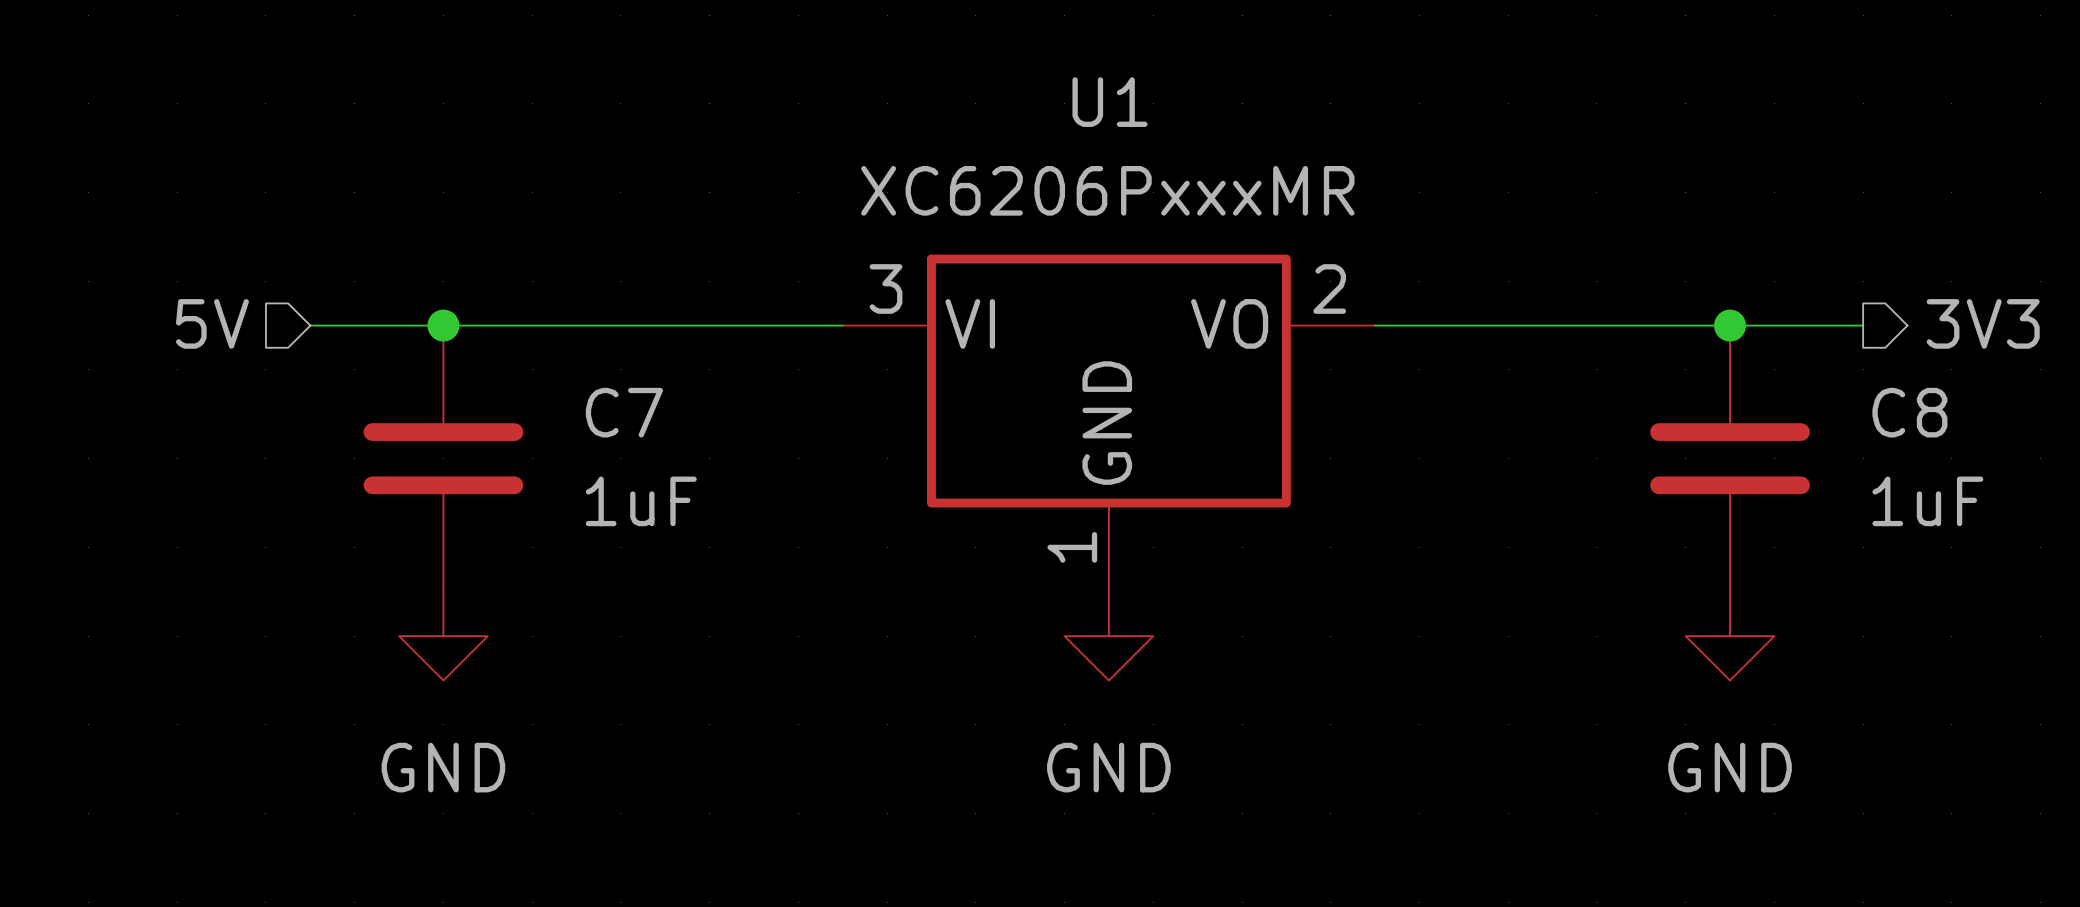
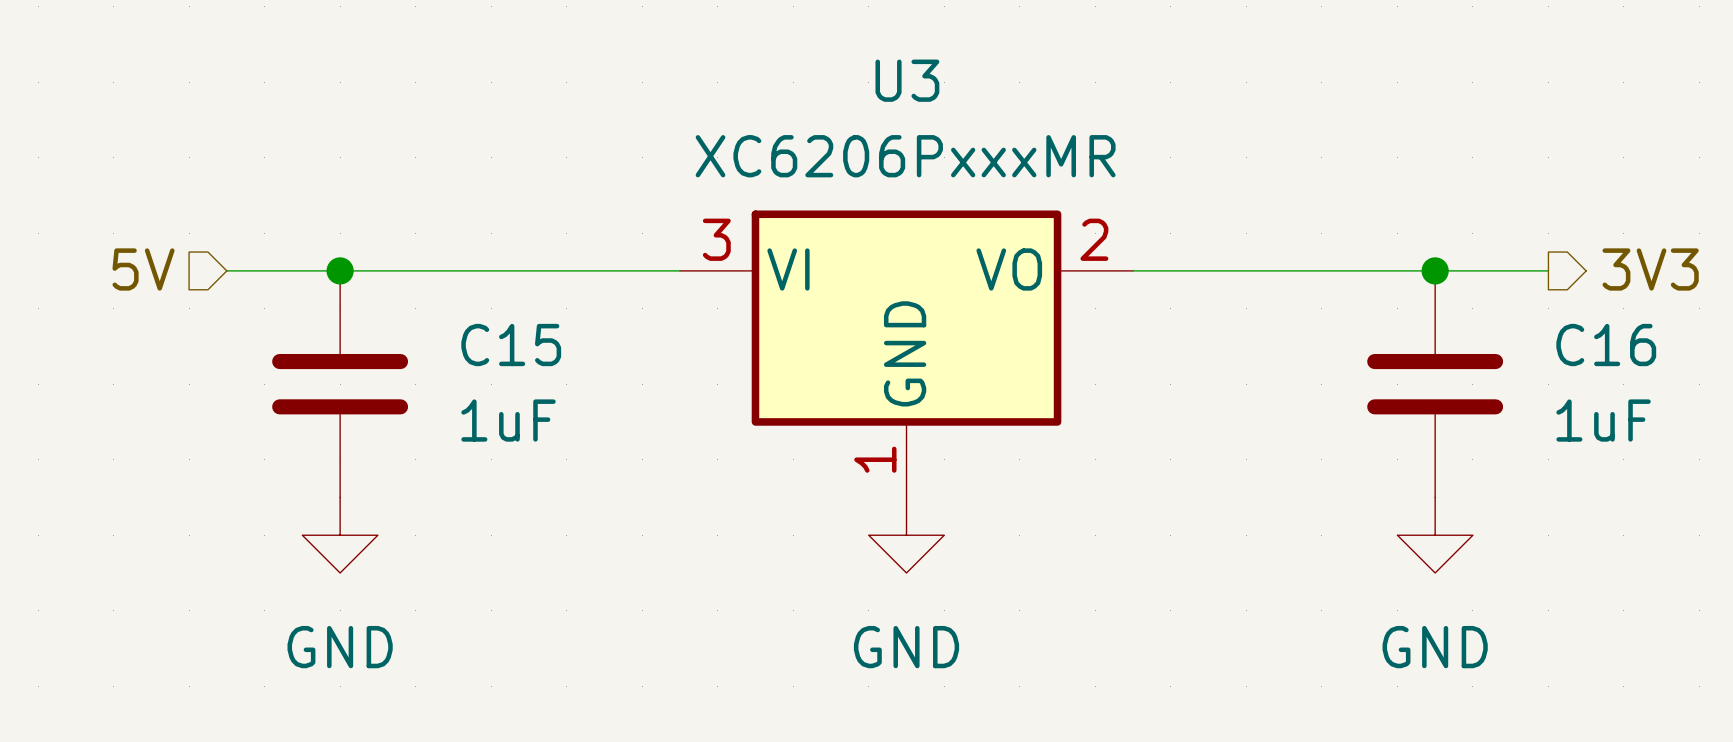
U1 name: U1 (1109, 102) -> U3 (907, 80)
C7 name: C7 (624, 412) -> C15 (511, 345)
C8 name: C8 (1909, 412) -> C16 (1606, 345)

